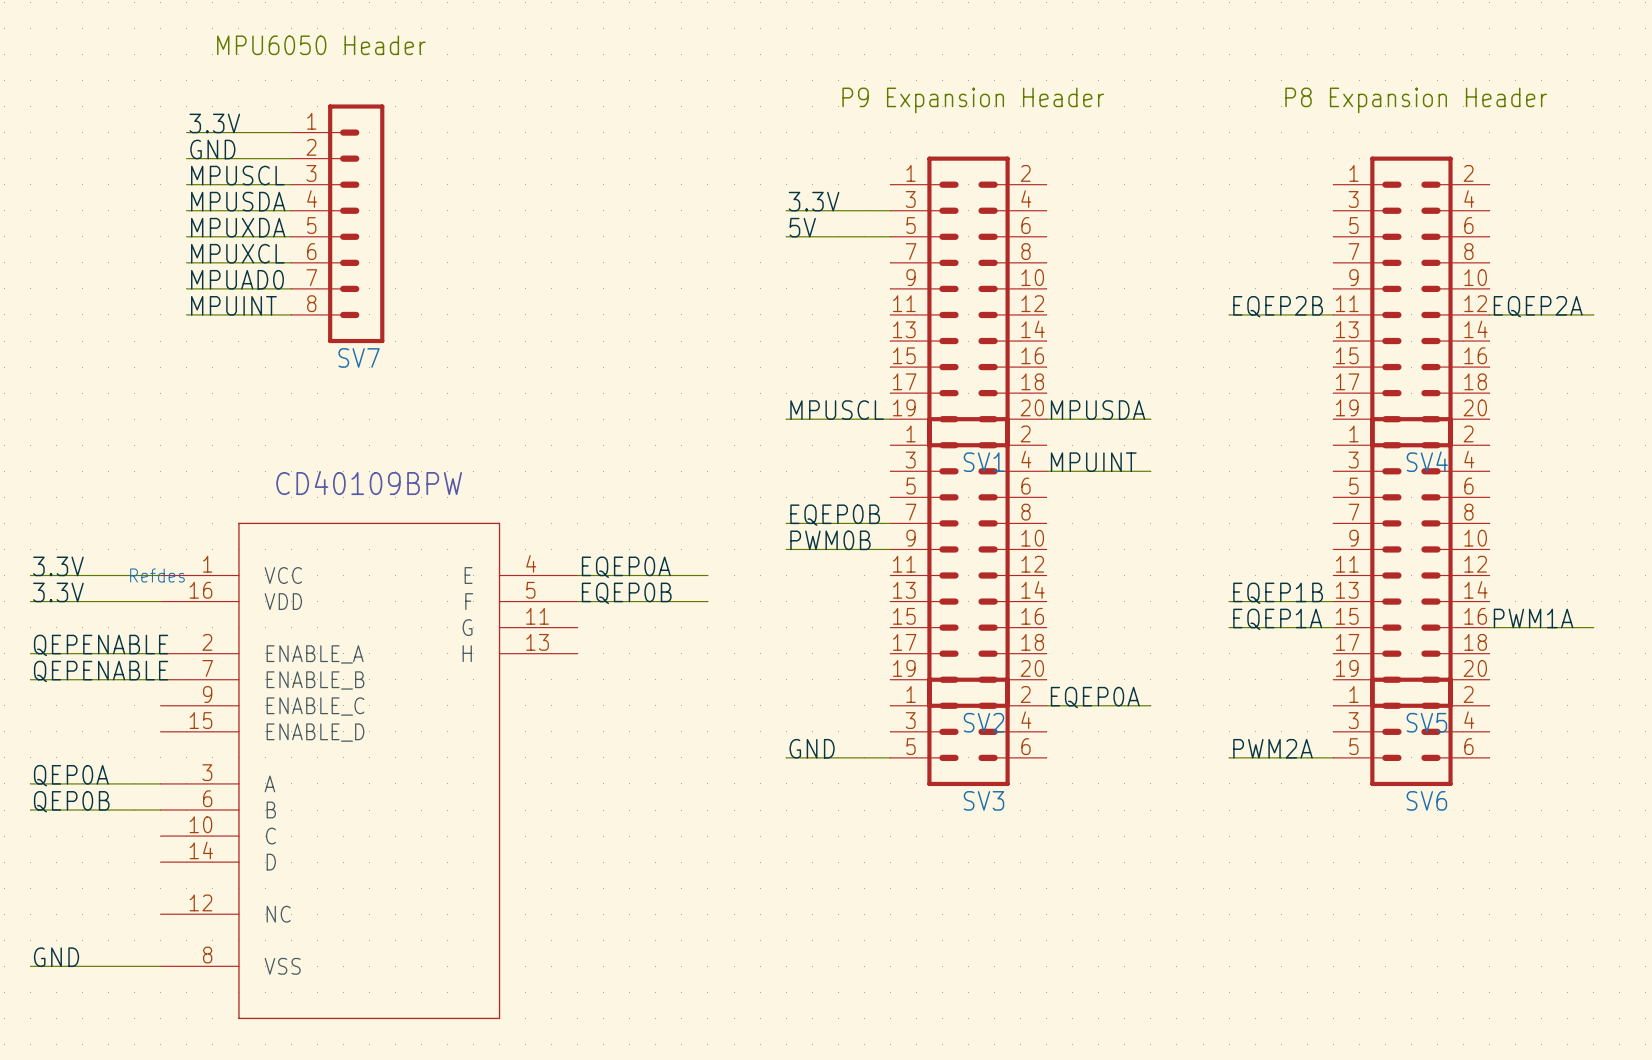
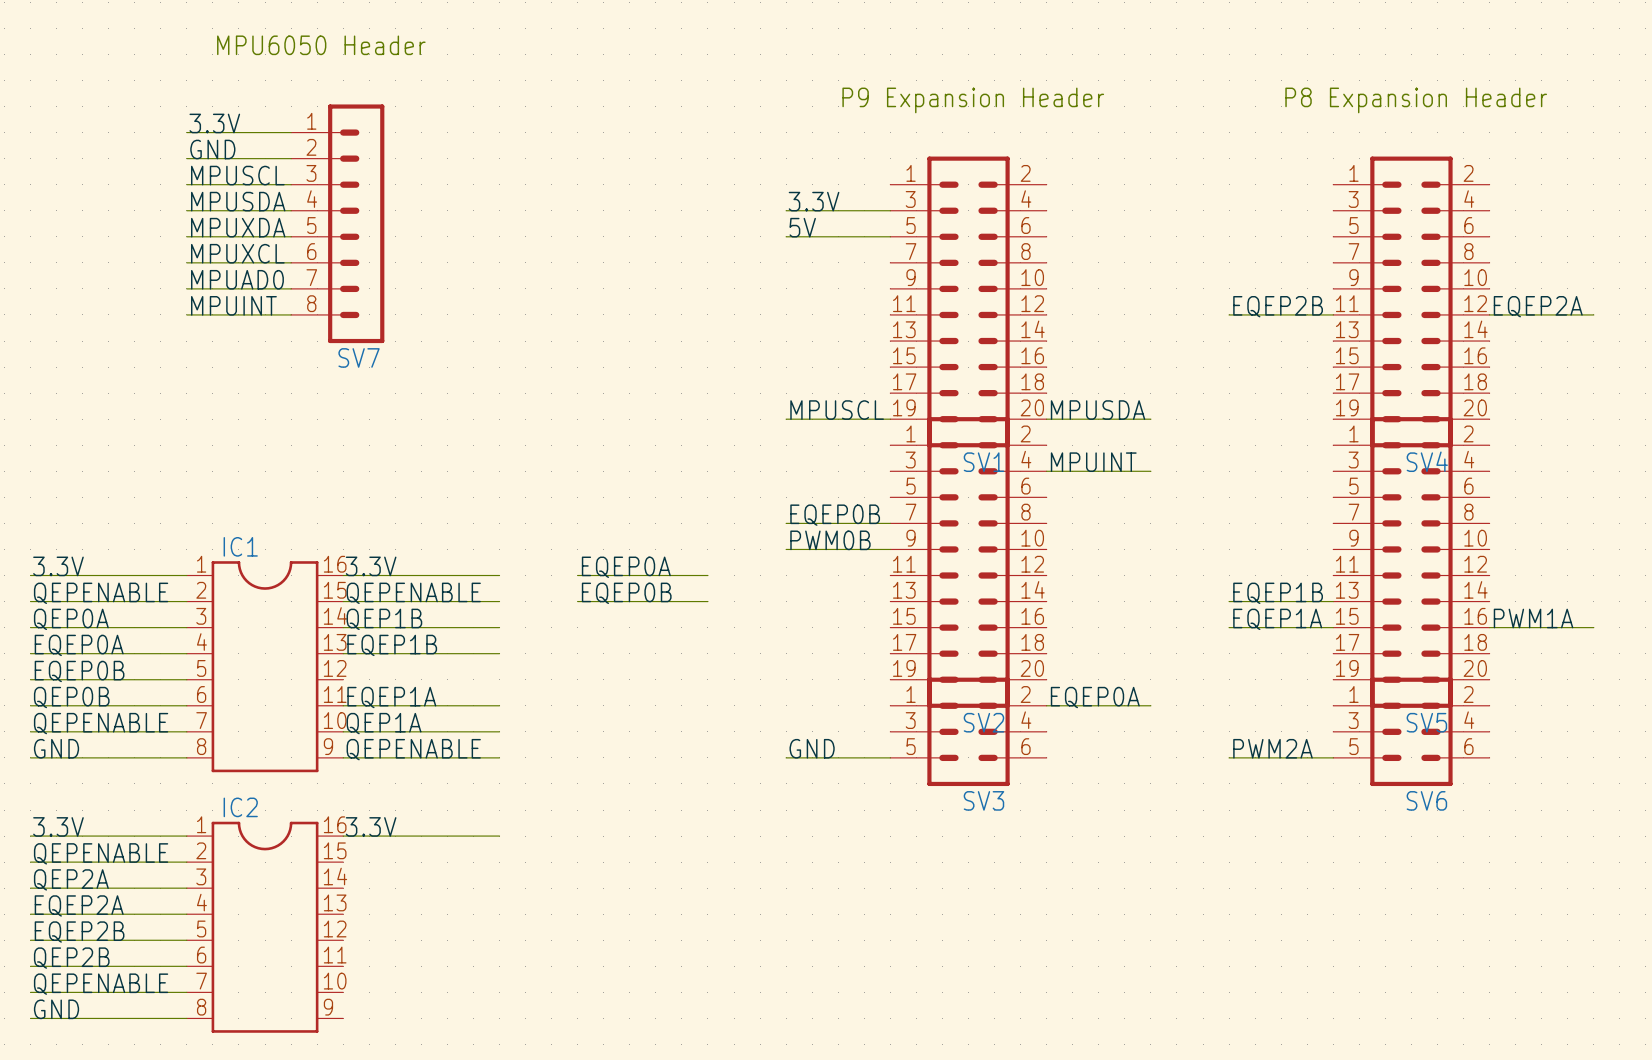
label: none -> 3.3V (371, 566)
wire: none -> (343, 575) (499, 575)
label: 3.3V (58, 592) -> QEPENABLE (101, 593)
label: none -> QEPENABLE (413, 593)
wire: none -> (343, 601) (499, 601)
label: none -> QEP1B (384, 619)
wire: none -> (30, 627) (186, 627)
wire: none -> (343, 627) (499, 627)
label: QEPENABLE (101, 645) -> EQEP0A (79, 645)
label: none -> EQEP1B (392, 645)
wire: none -> (343, 653) (499, 653)
IC1: none -> (265, 666)
label: QEPENABLE (101, 671) -> EQEP0B (79, 671)
label: none -> EQEP1A (391, 697)
wire: none -> (30, 705) (186, 705)
wire: none -> (343, 705) (499, 705)
label: none -> QEPENABLE (101, 723)
label: none -> QEP1A (384, 723)
wire: none -> (30, 731) (186, 731)
wire: none -> (343, 731) (499, 731)
label: none -> GND (56, 748)
label: none -> QEPENABLE (413, 749)
wire: none -> (30, 757) (186, 757)
wire: none -> (343, 757) (499, 757)
part: (369, 770) -> none
label position: QEP0A (71, 775) -> QEP0A (71, 619)
wire: (30, 783) (160, 783) -> none
label position: QEP0B (71, 801) -> QEP0B (71, 697)
wire: (30, 810) (160, 810) -> none
label: none -> 3.3V (58, 826)
label: none -> 3.3V (371, 826)
wire: none -> (30, 836) (186, 836)
wire: none -> (343, 836) (499, 836)
label: none -> QEPENABLE (101, 853)
wire: none -> (30, 862) (186, 862)
label: none -> QEP2A (71, 879)
wire: none -> (30, 888) (186, 888)
label: none -> EQEP2A (79, 905)
wire: none -> (30, 914) (186, 914)
IC2: none -> (265, 927)
label: none -> EQEP2B (79, 932)
wire: none -> (30, 940) (186, 940)
label: GND (56, 957) -> QEP2B (71, 958)
label: none -> QEPENABLE (101, 984)
wire: none -> (30, 992) (186, 992)
label: none -> GND (56, 1009)
wire: none -> (30, 1018) (186, 1018)

